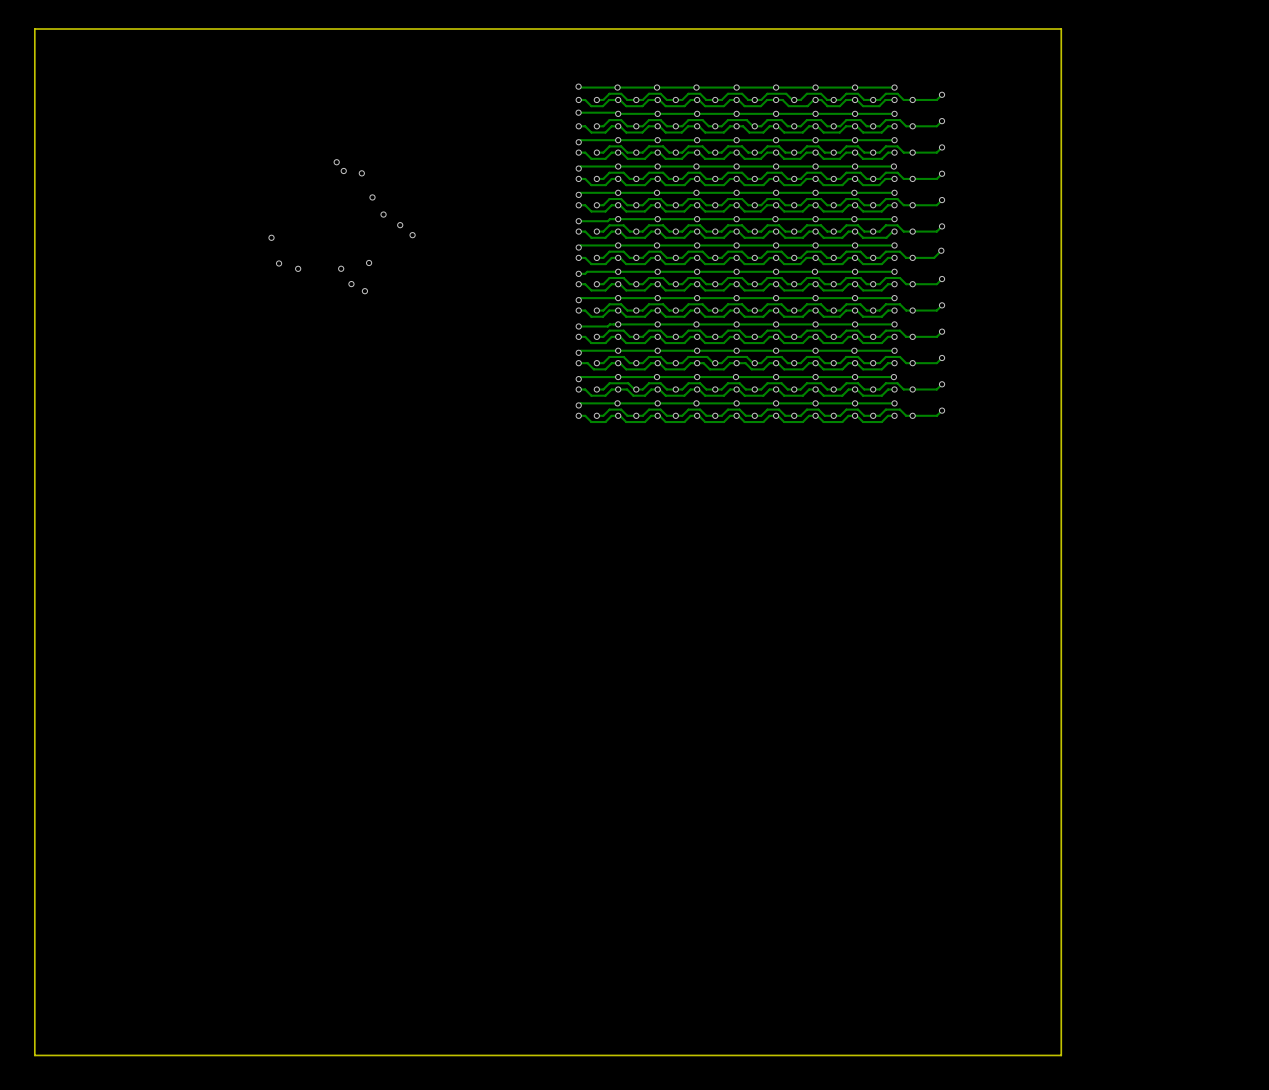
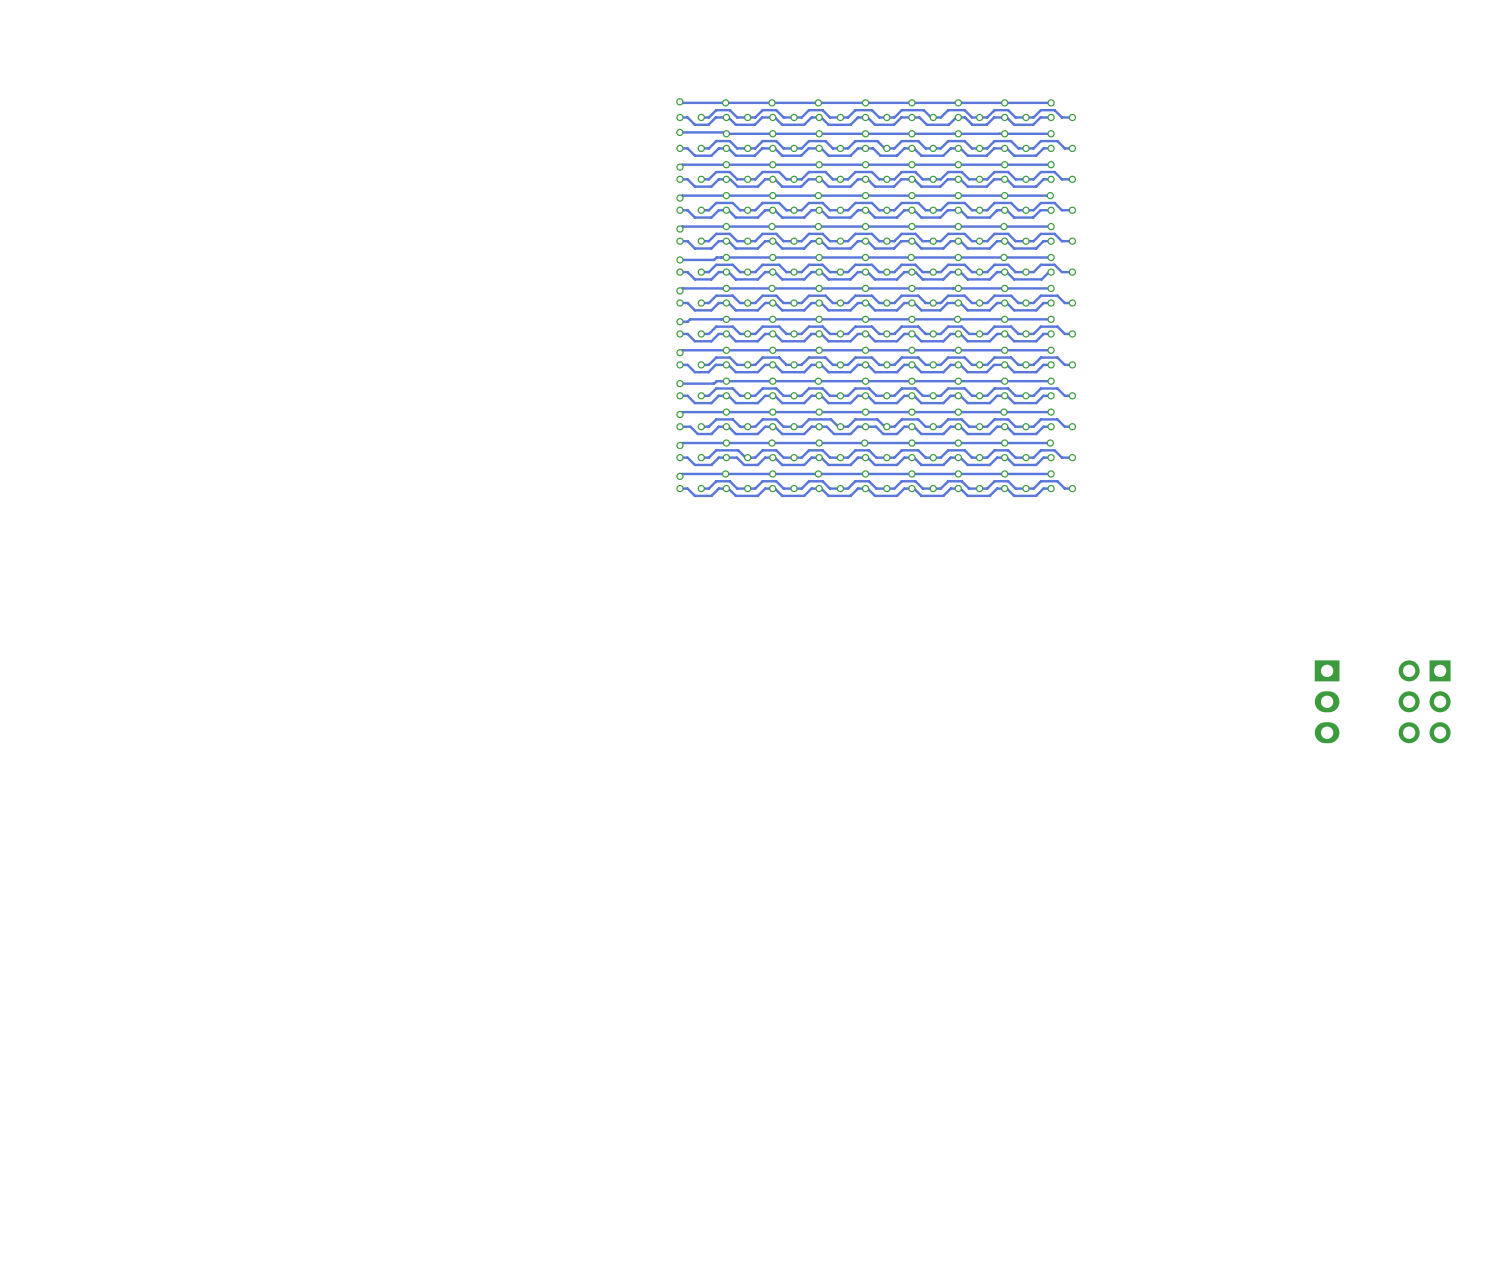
board edge: (1061, 29) (1061, 1055) (34, 1055) (34, 29) (1061, 29) -> none
track: (942, 94) (936, 99) (912, 99) -> none
via: (942, 94) -> none
track: (942, 121) (936, 126) (912, 126) -> none
via: (942, 121) -> none
track: (942, 147) (936, 152) (912, 152) -> none
via: (942, 147) -> none
via: (336, 162) -> none
via: (343, 170) -> none
via: (361, 173) -> none
track: (942, 173) (936, 178) (912, 178) -> none
via: (942, 173) -> none
via: (372, 197) -> none
track: (942, 200) (936, 205) (912, 205) -> none
via: (942, 200) -> none
via: (383, 214) -> none
via: (400, 225) -> none
track: (942, 226) (936, 231) (912, 231) -> none
via: (942, 226) -> none
via: (412, 235) -> none
via: (271, 237) -> none
track: (941, 250) (934, 257) (912, 257) -> none
via: (941, 250) -> none
via: (369, 262) -> none
via: (279, 263) -> none
via: (298, 268) -> none
via: (341, 268) -> none
track: (942, 279) (936, 284) (912, 284) -> none
via: (942, 279) -> none
via: (351, 284) -> none
via: (364, 291) -> none
track: (942, 305) (936, 310) (912, 310) -> none
via: (942, 305) -> none
track: (942, 331) (936, 336) (912, 336) -> none
via: (942, 331) -> none
track: (942, 357) (936, 363) (912, 363) -> none
via: (942, 357) -> none
track: (942, 384) (936, 389) (912, 389) -> none
via: (942, 384) -> none
track: (942, 410) (936, 415) (912, 415) -> none
via: (942, 410) -> none
part: none -> (1327, 701)
part: none -> (1424, 701)

